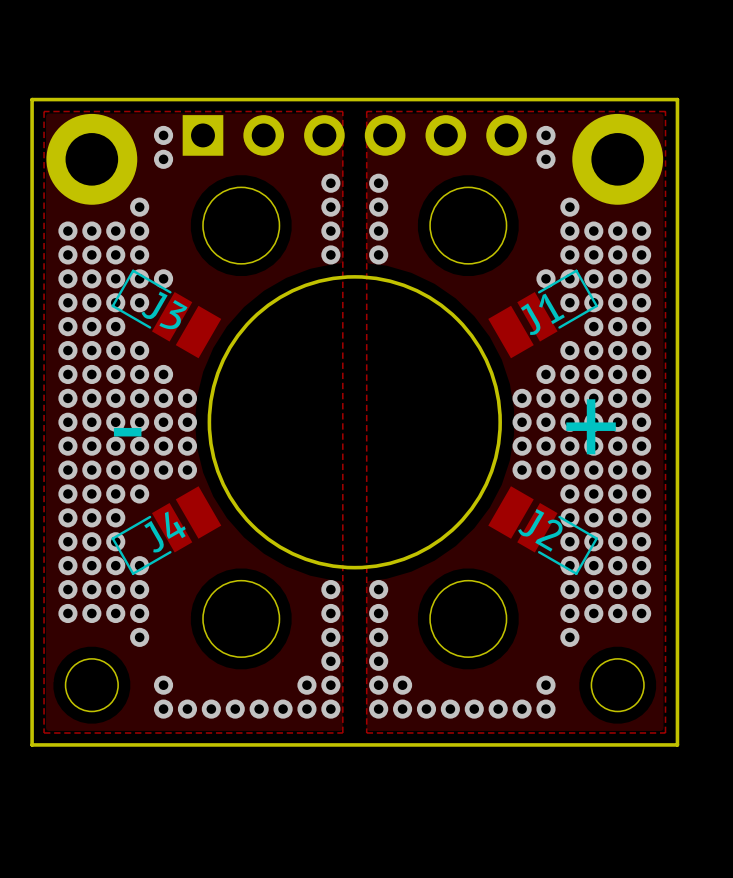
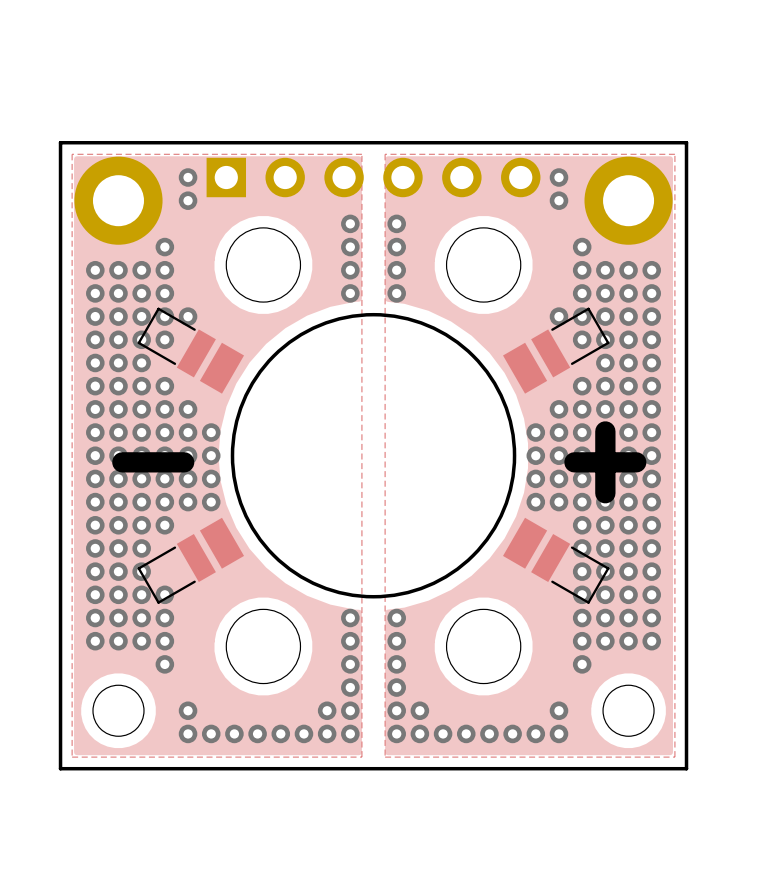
J3 name: J3 (164, 310) -> none
J1 name: J1 (542, 314) -> none
J2 name: J2 (540, 530) -> none
J4 name: J4 (164, 532) -> none

